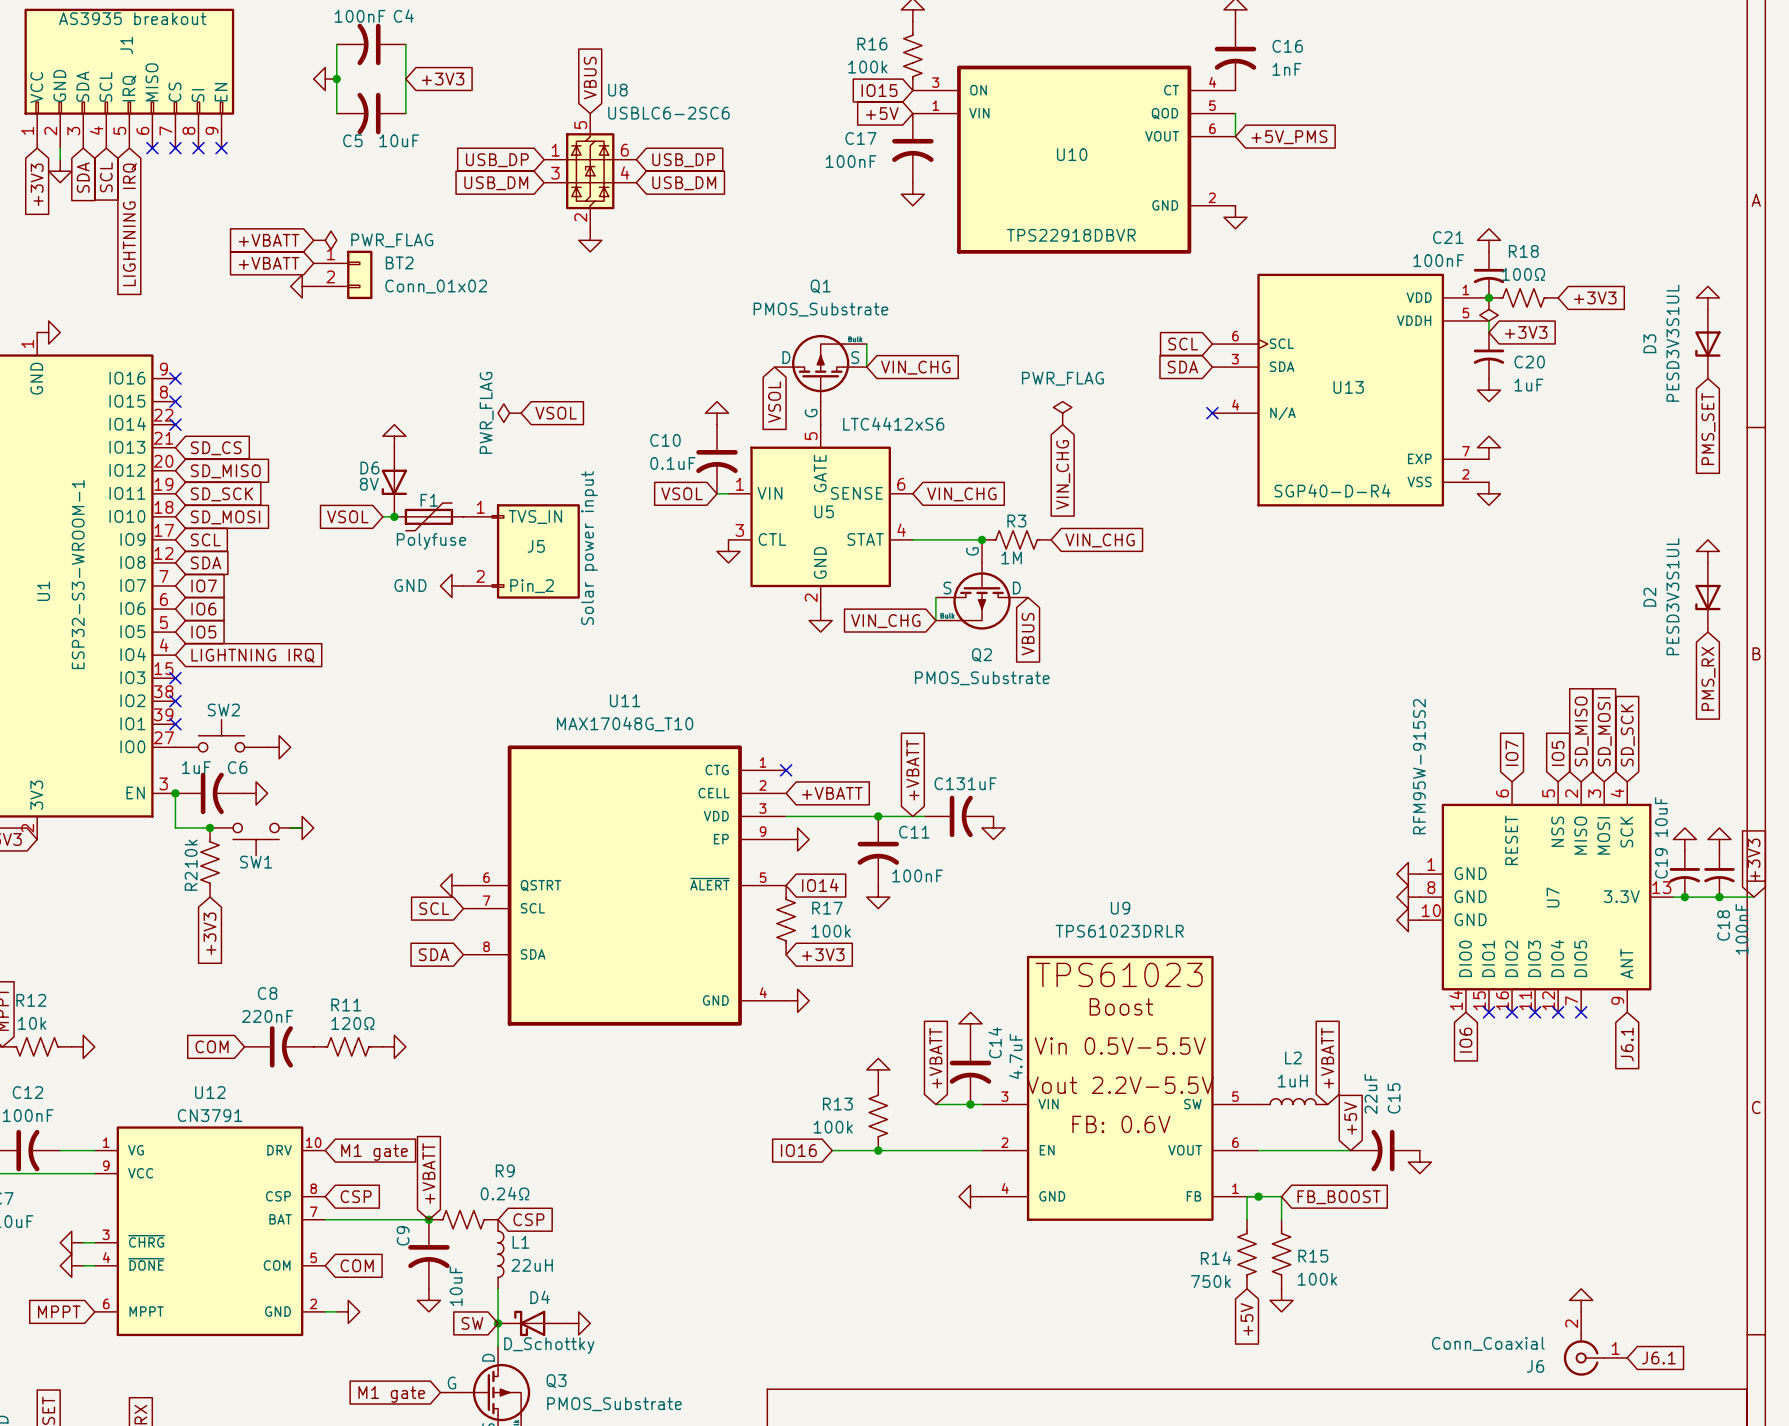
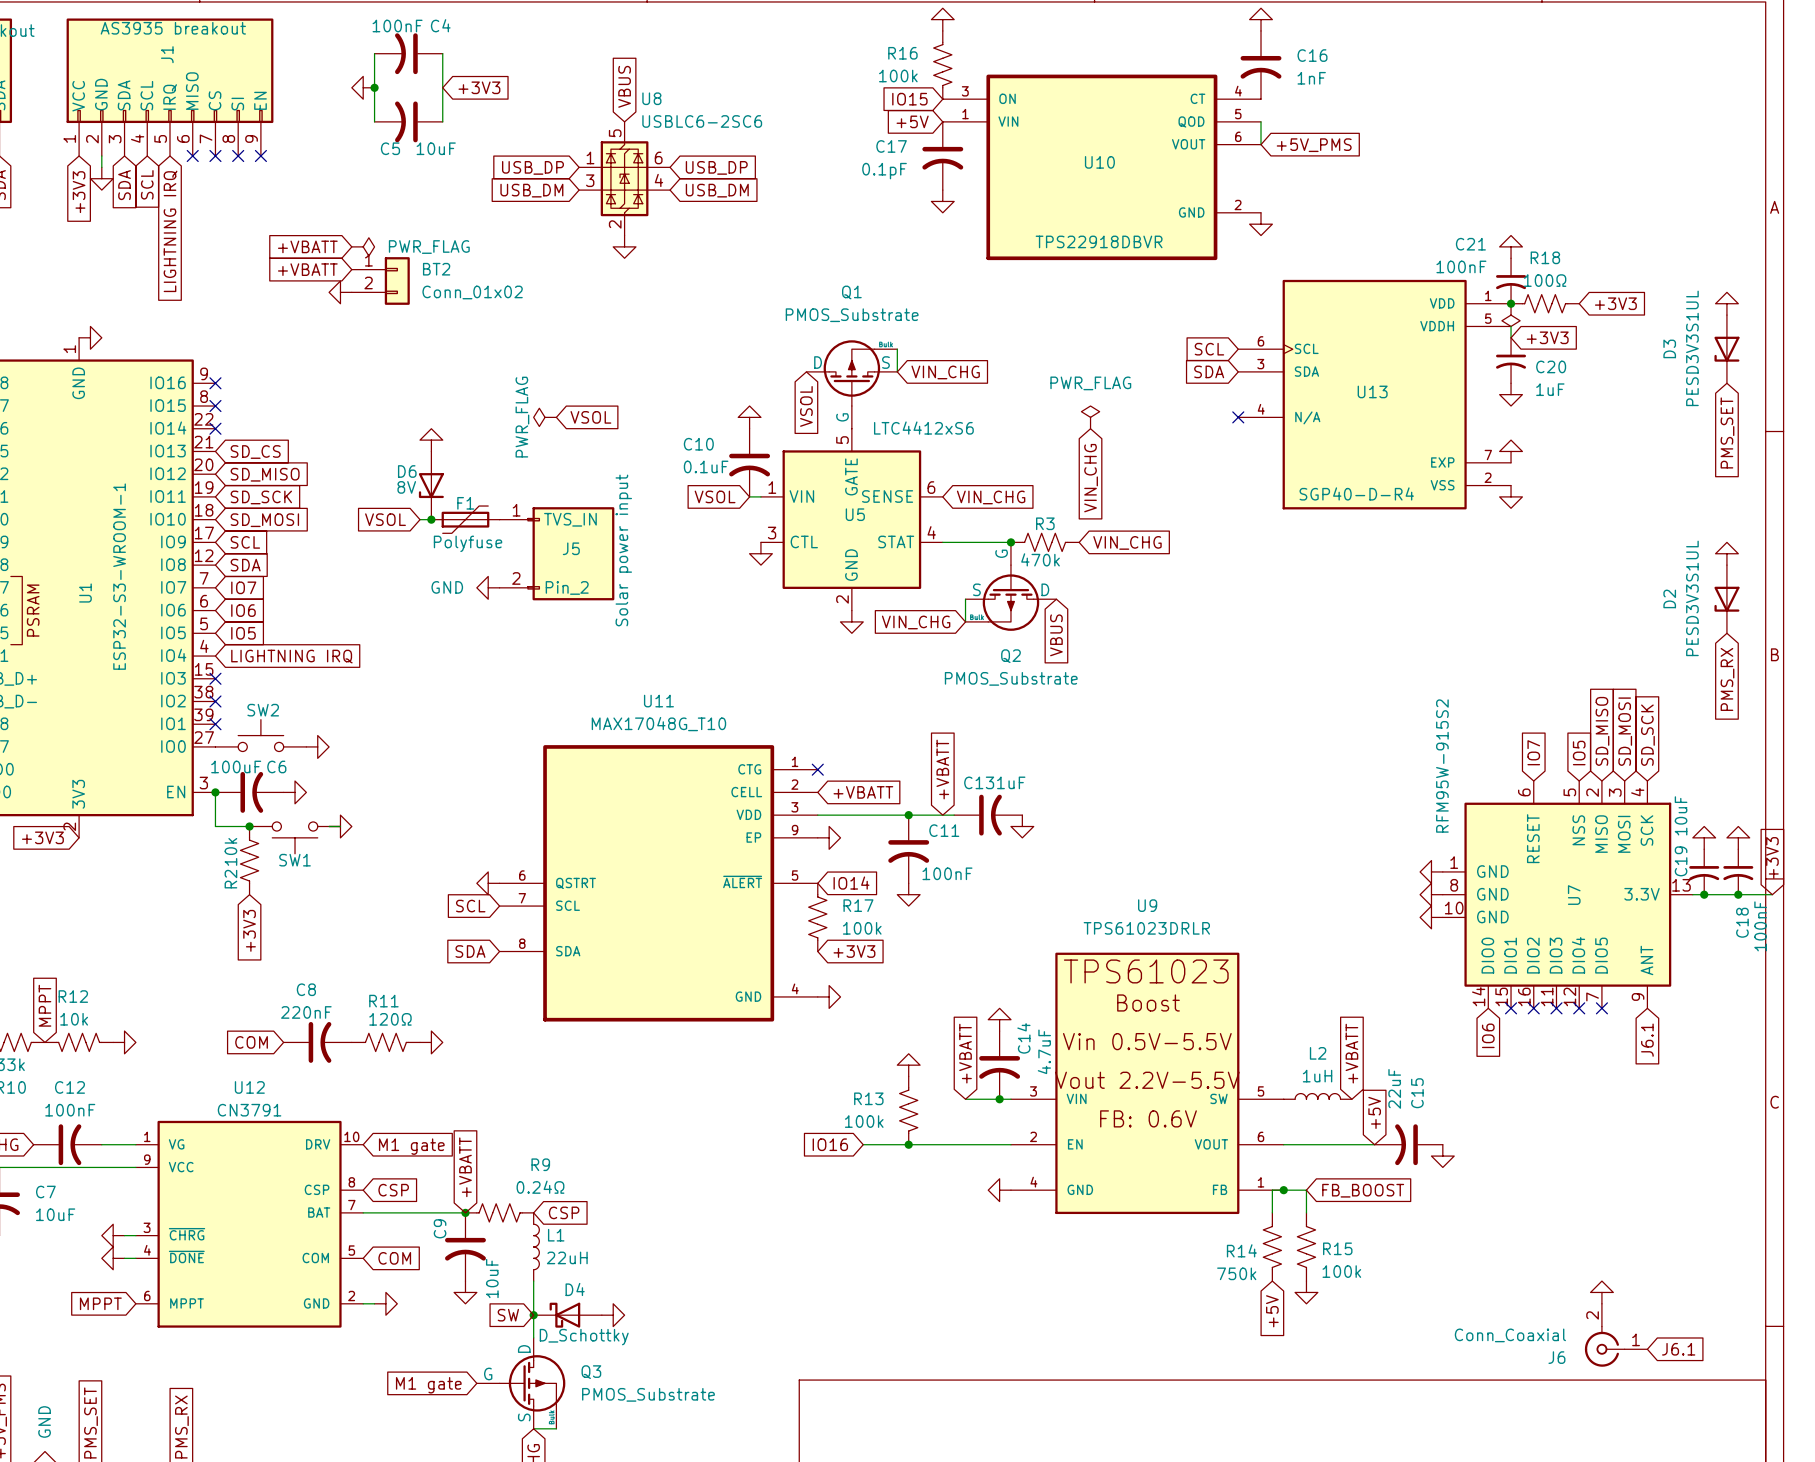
C17 value: 100nF (851, 161) -> 0.1pF (884, 171)
R3 value: 1M (1011, 557) -> 470k (1040, 559)
C6 value: 1uF (196, 767) -> 100uF (236, 766)

